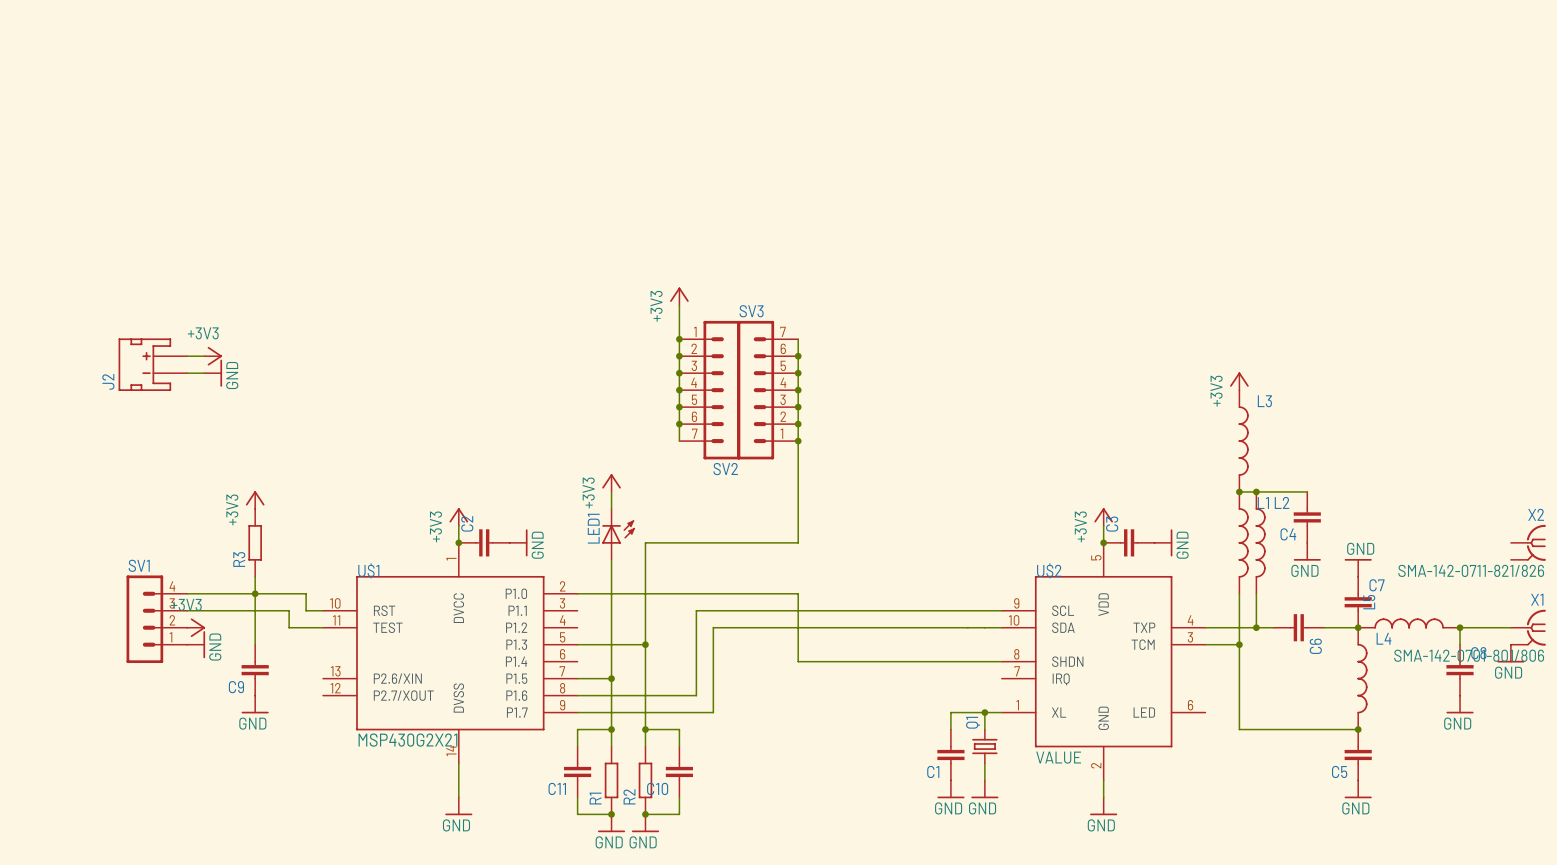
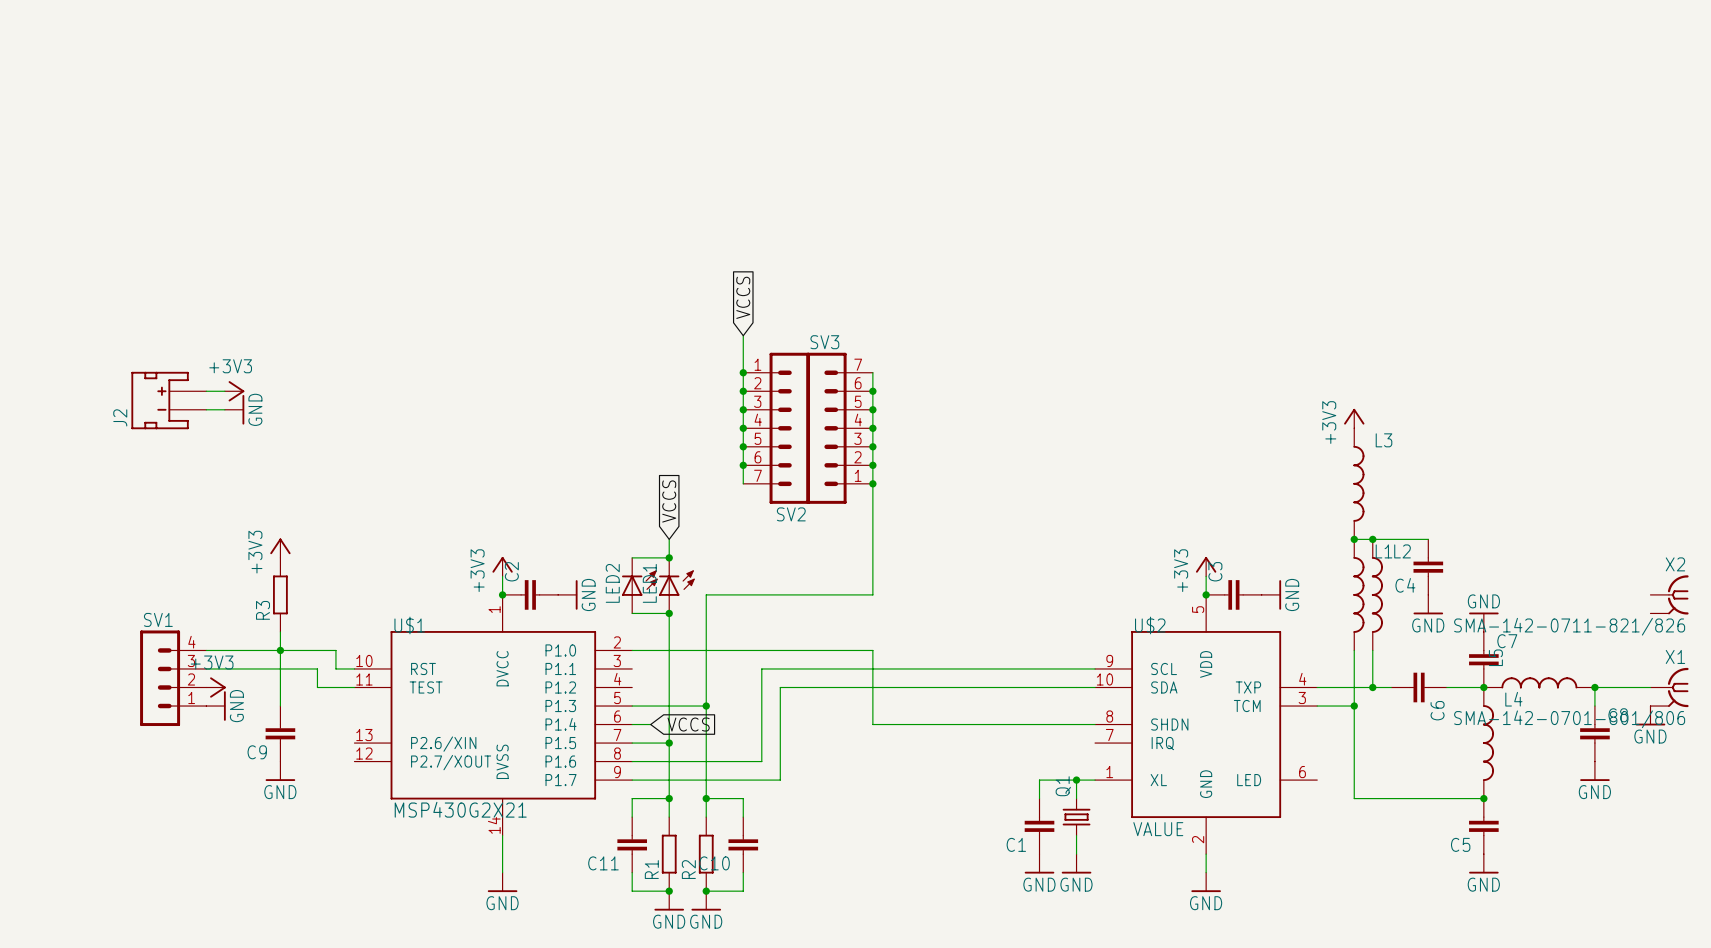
global label: none -> VCCS (743, 297)
power symbol: +3V3 (679, 296) -> none
global label: none -> VCCS (669, 501)
power symbol: +3V3 (611, 483) -> none
wire: none -> (632, 557) (669, 557)
junction: none -> (669, 557)
LED2: none -> (639, 585)
wire: none -> (632, 613) (669, 613)
junction: none -> (669, 613)
wire: none -> (632, 724) (650, 724)
global label: none -> VCCS (688, 724)

